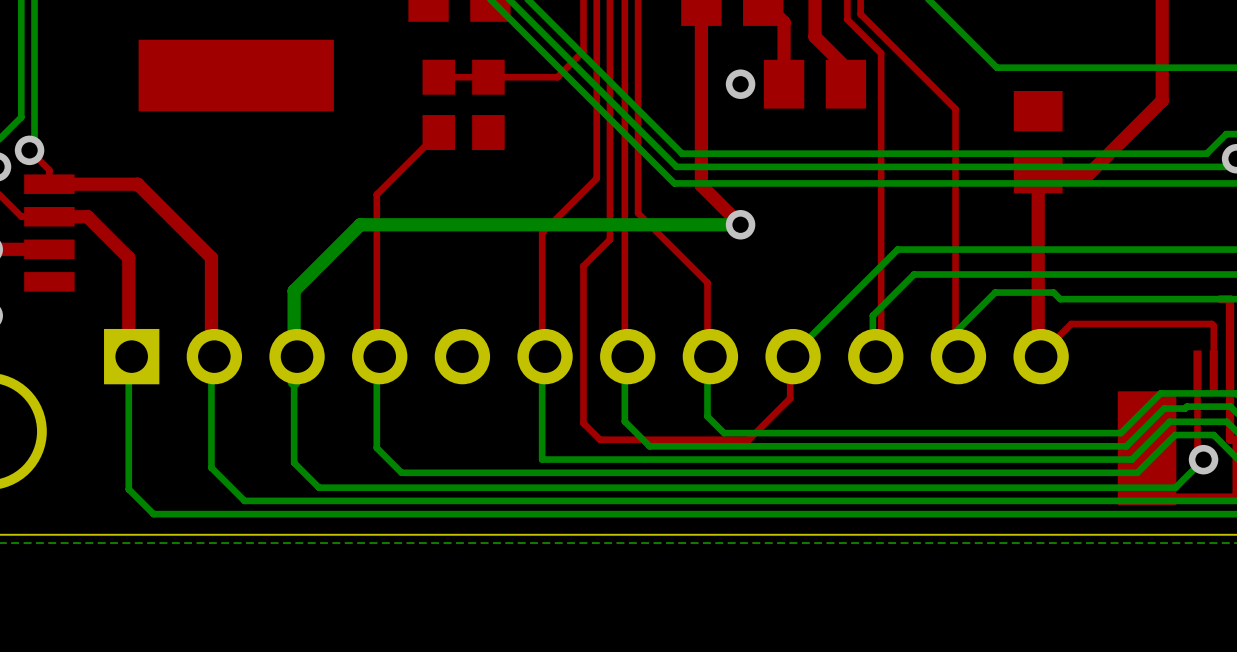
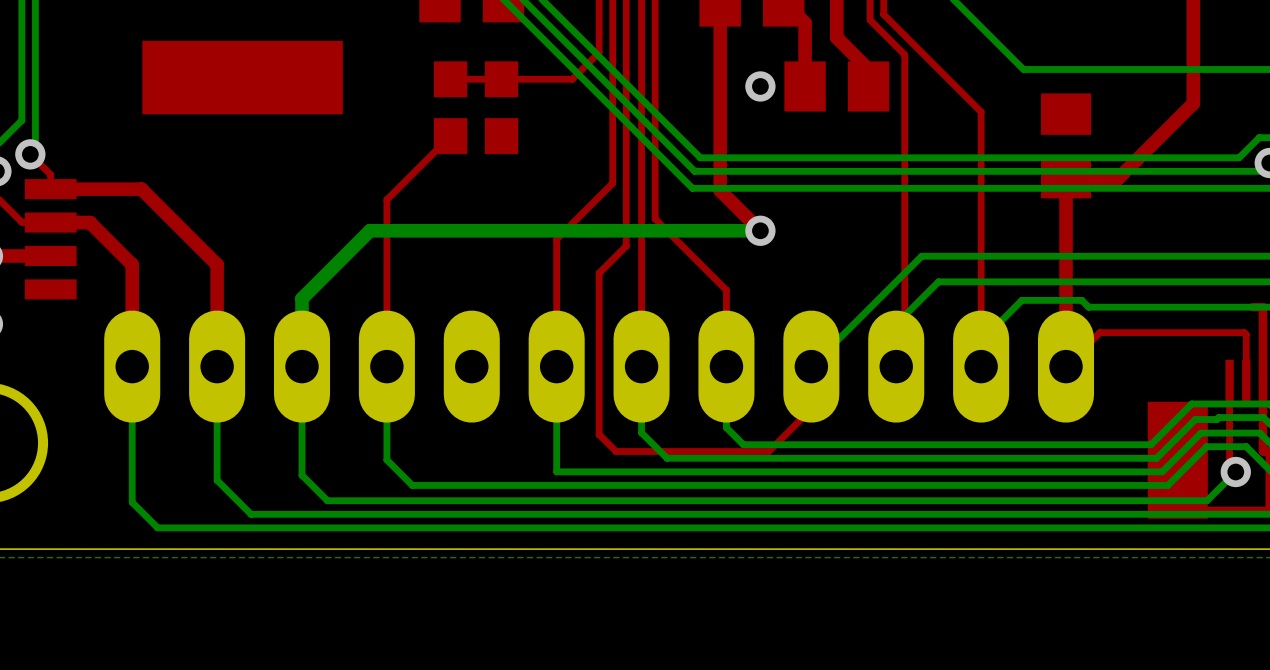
part footprint: [104, 328, 1069, 385] -> [104, 310, 1095, 423]

